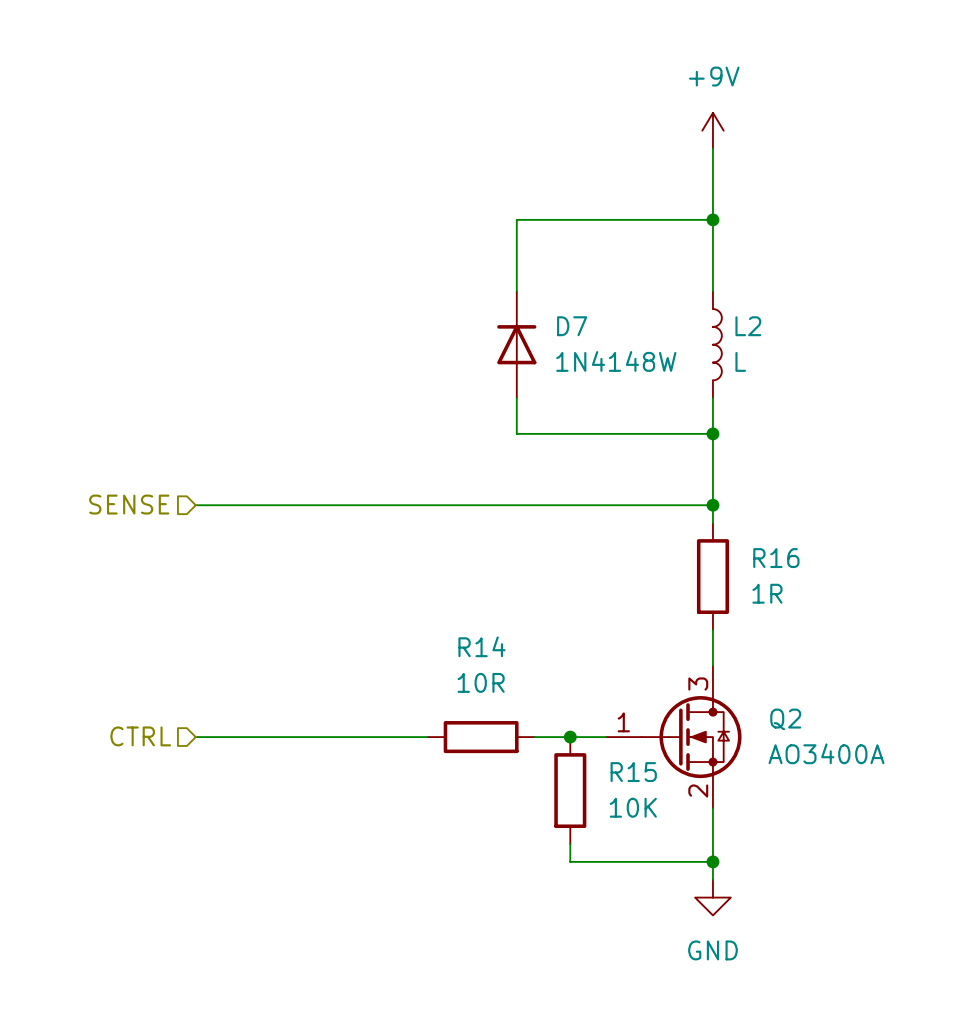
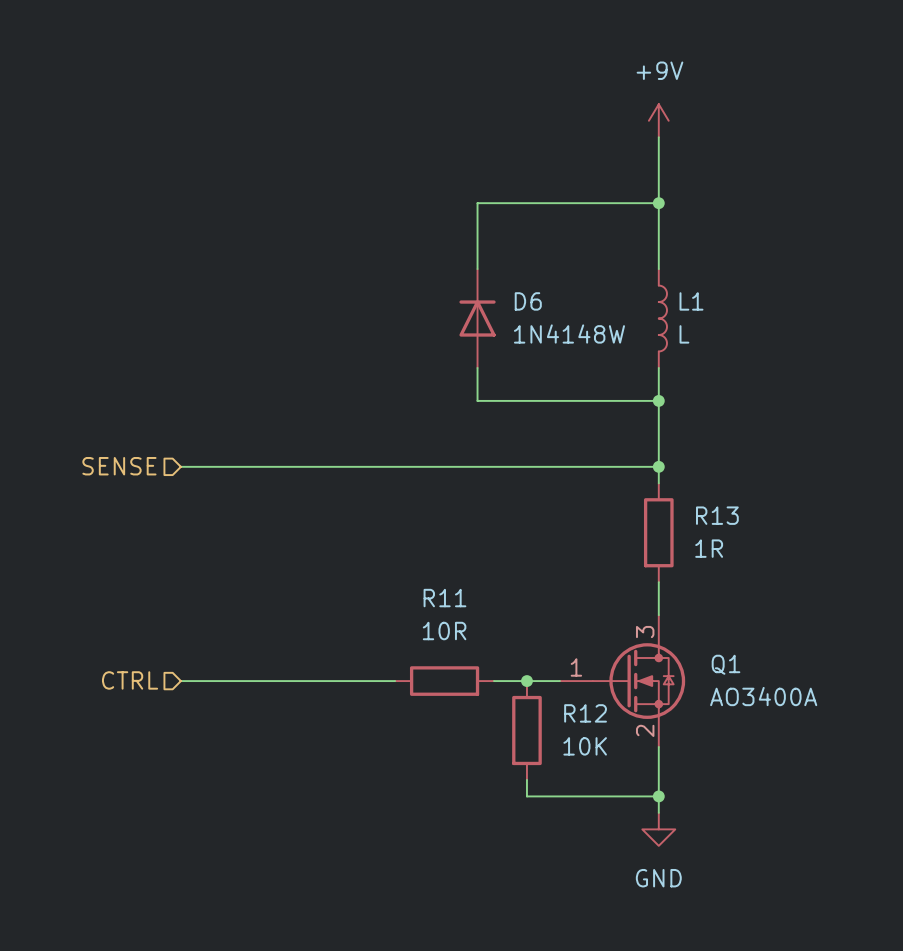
D7 name: D7 (572, 326) -> D6 (528, 301)
L2 name: L2 (748, 326) -> L1 (691, 301)
R16 name: R16 (776, 558) -> R13 (717, 515)
R14 name: R14 (481, 646) -> R11 (444, 598)
Q2 name: Q2 (785, 719) -> Q1 (726, 664)
R15 name: R15 (633, 772) -> R12 (585, 713)

